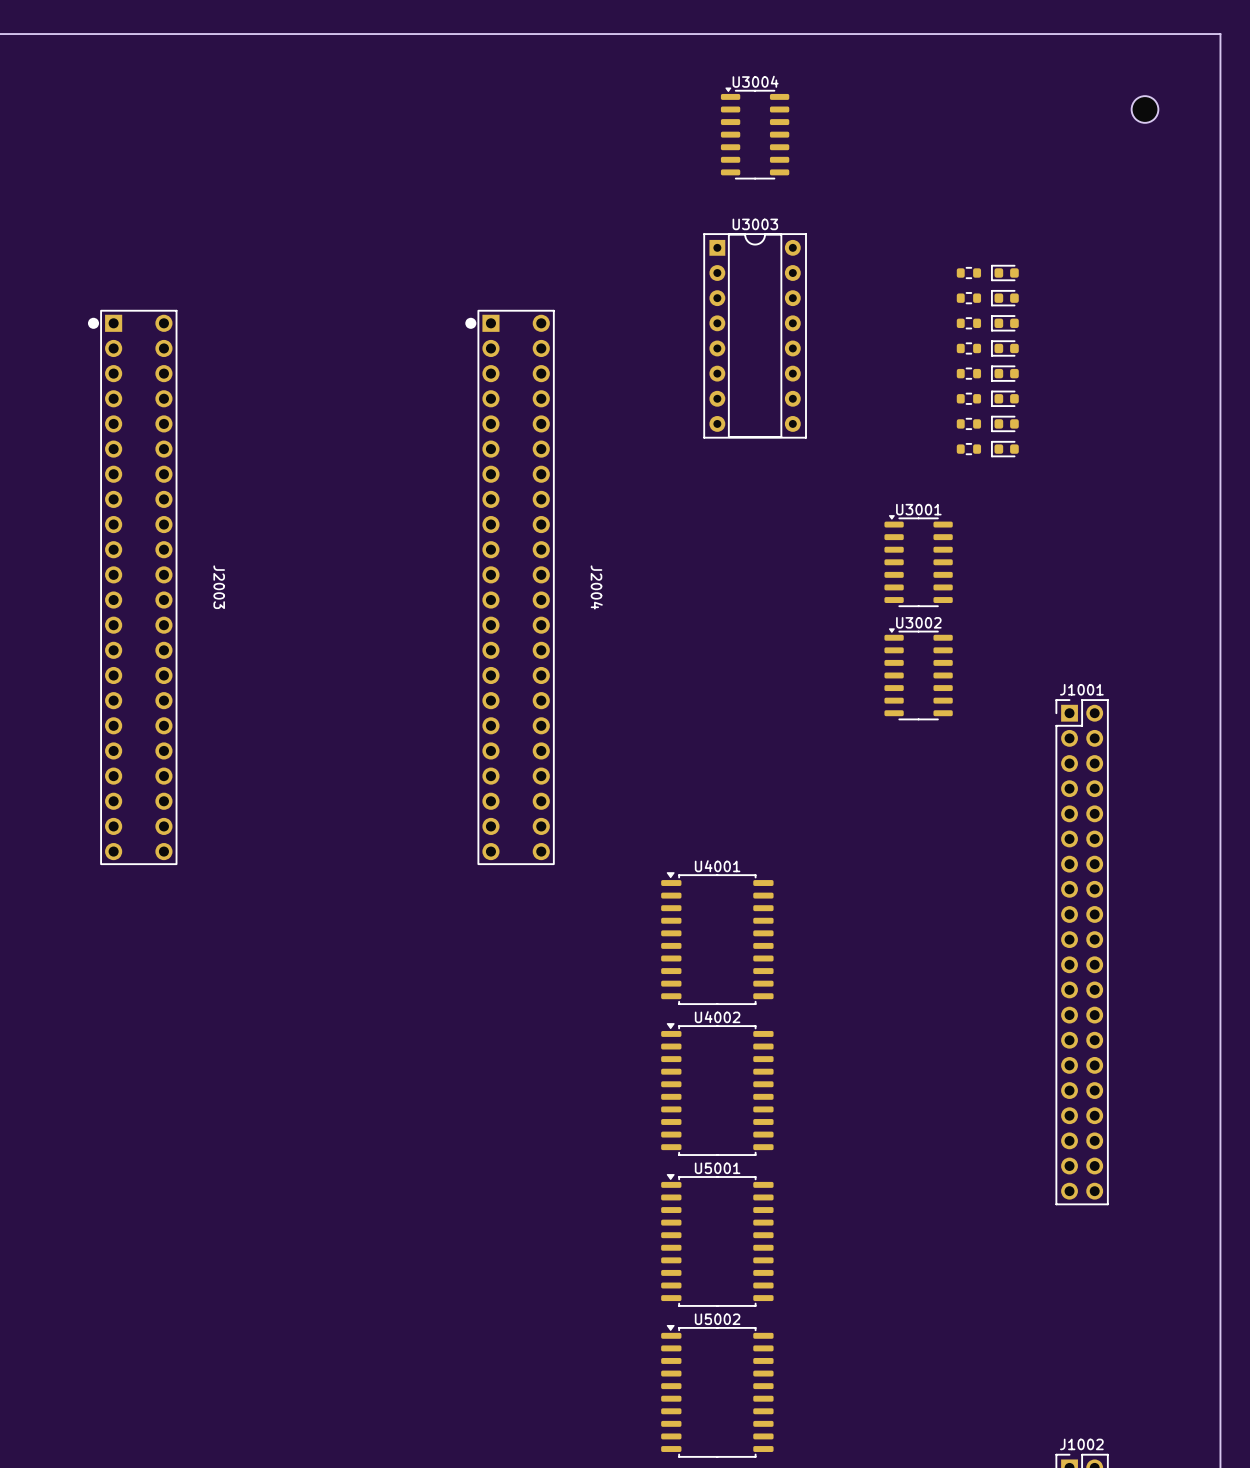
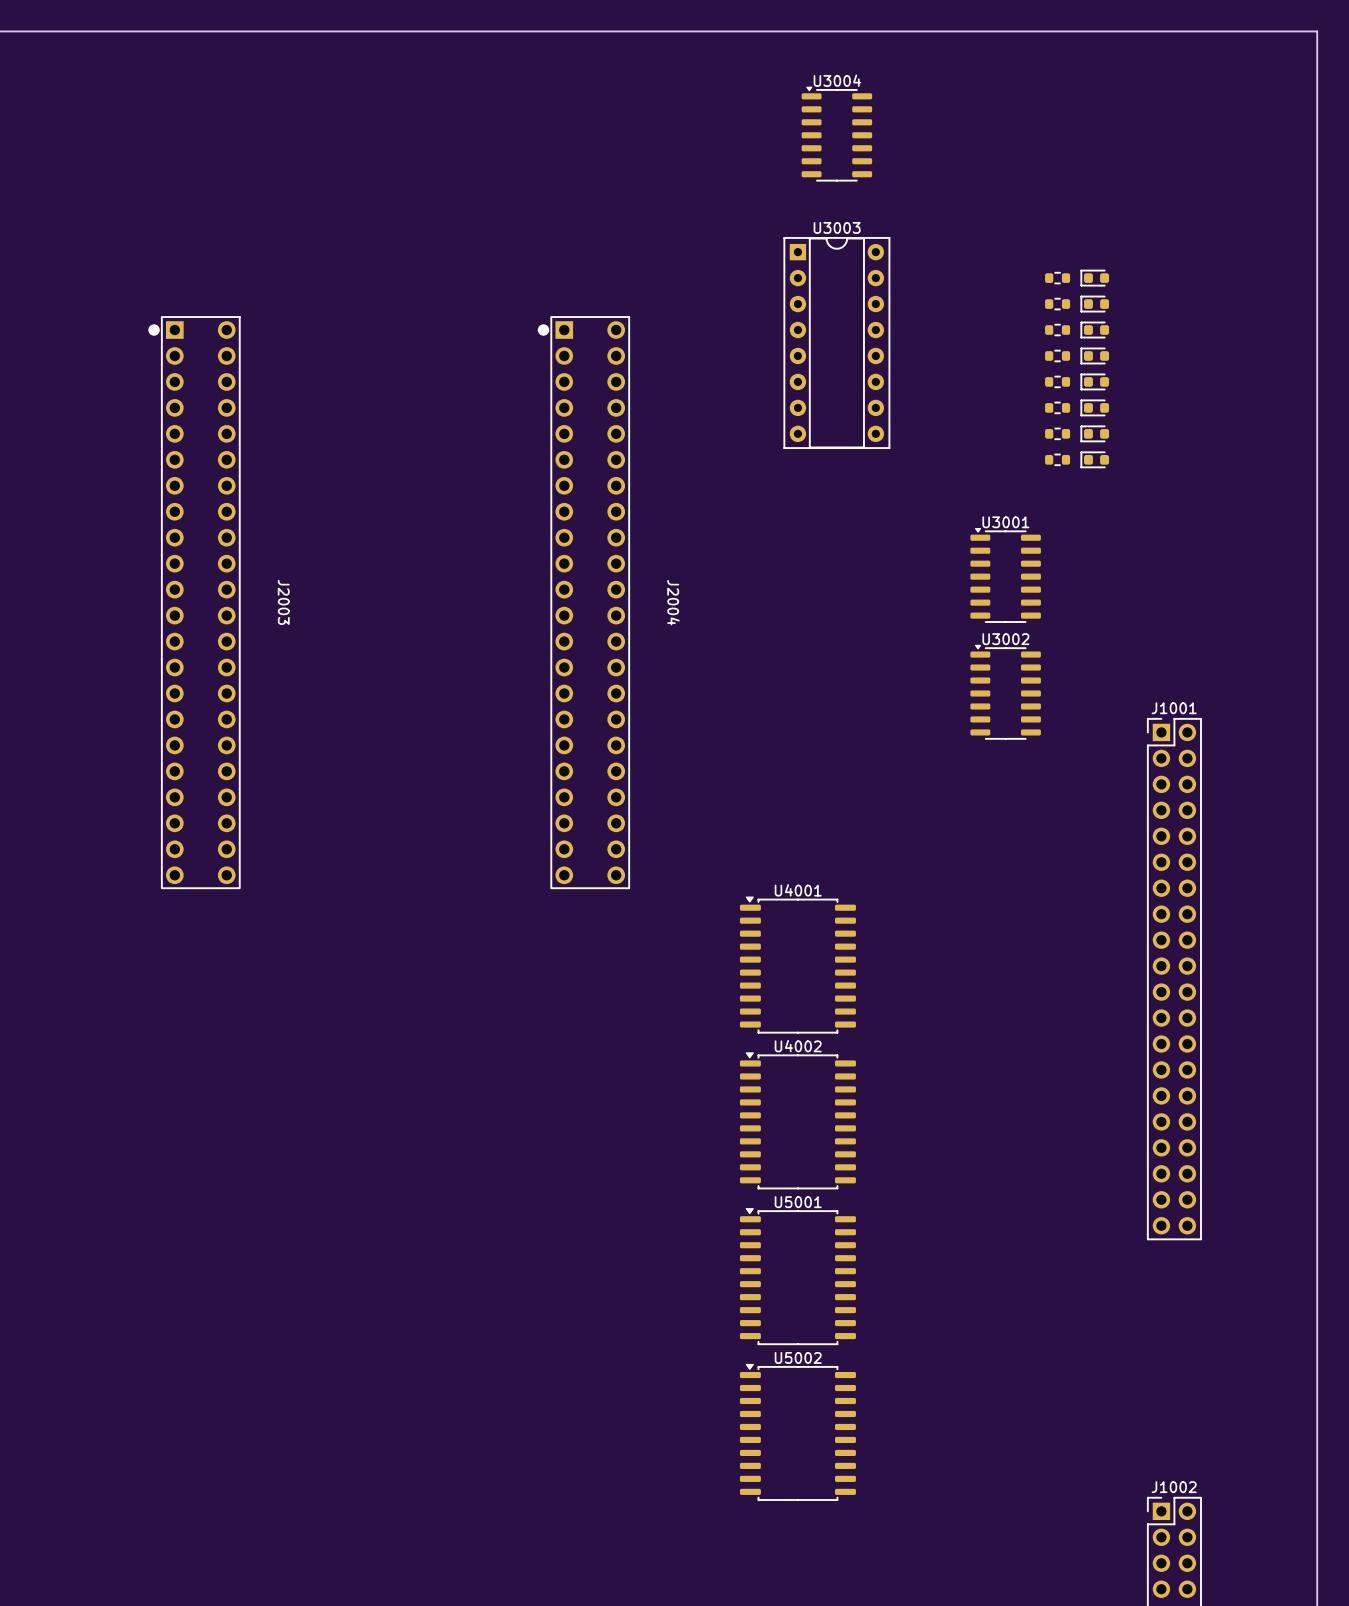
part: (1145, 109) -> none

